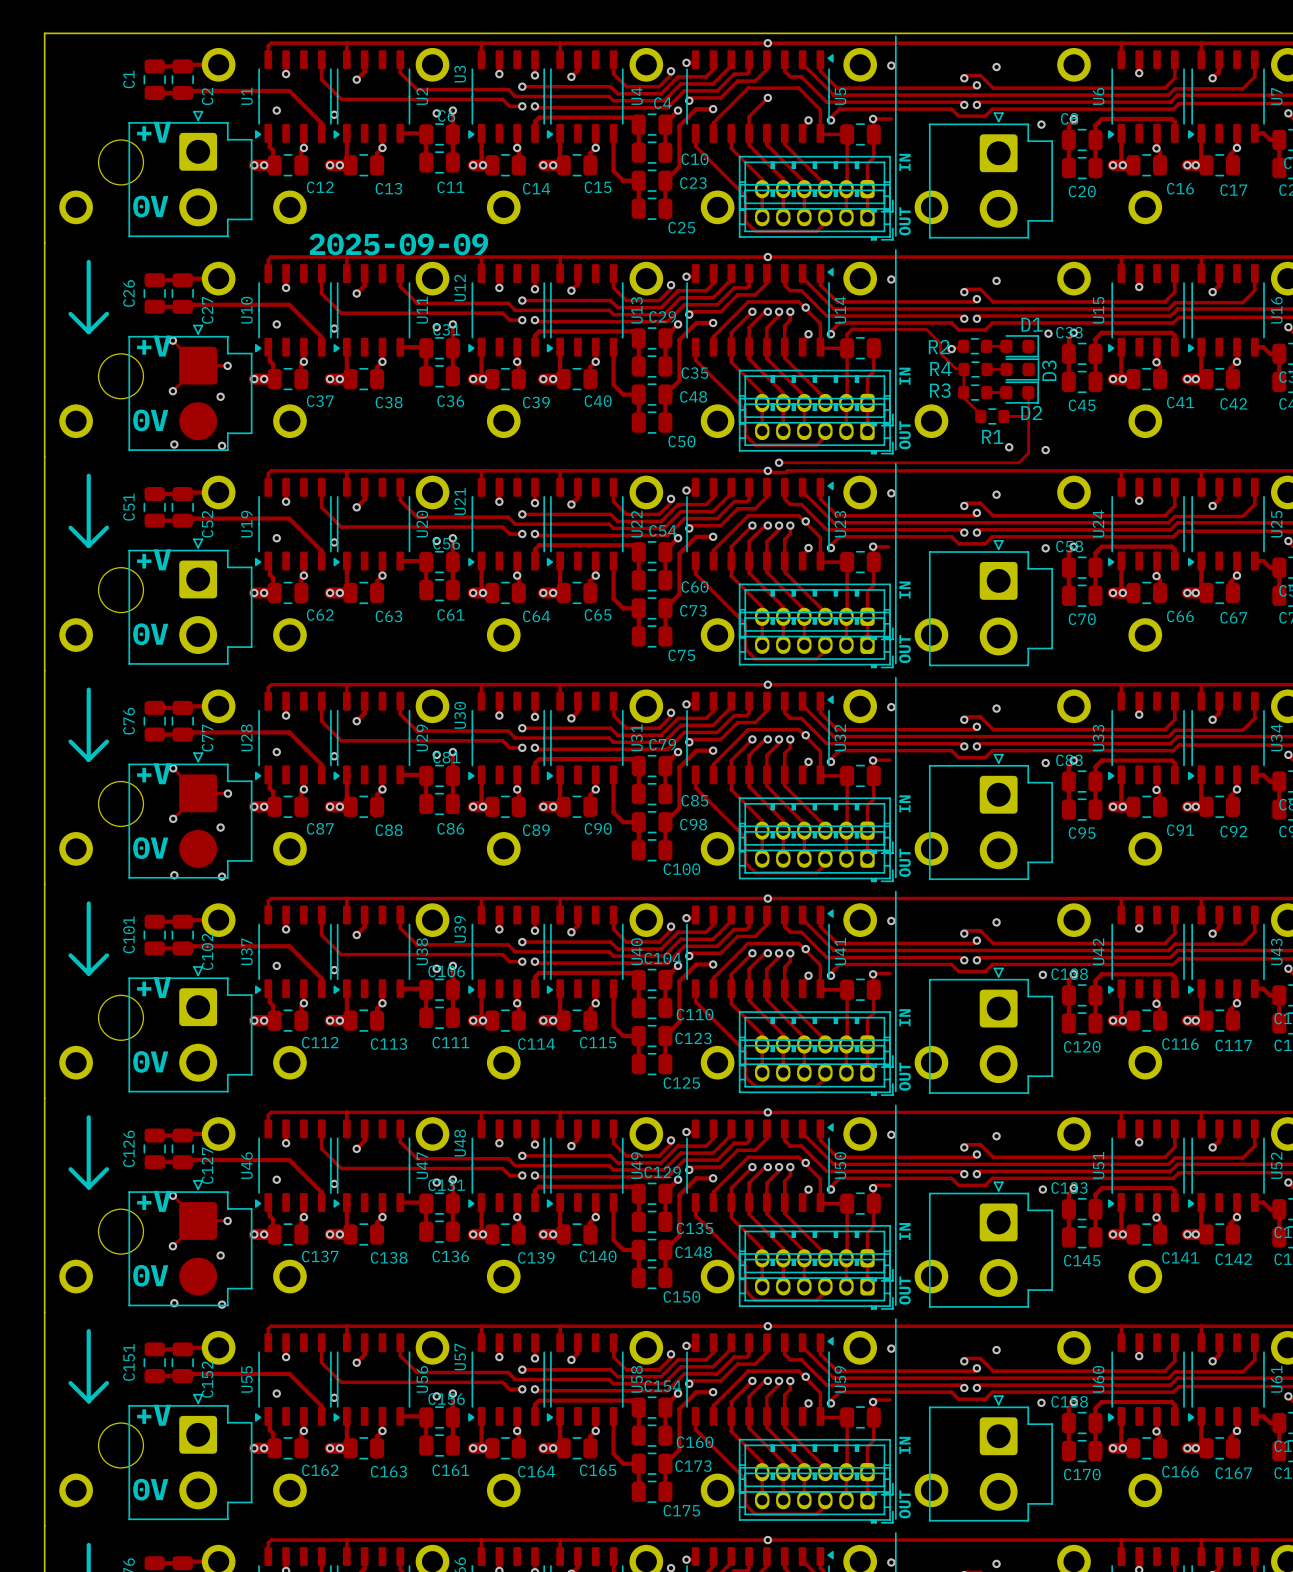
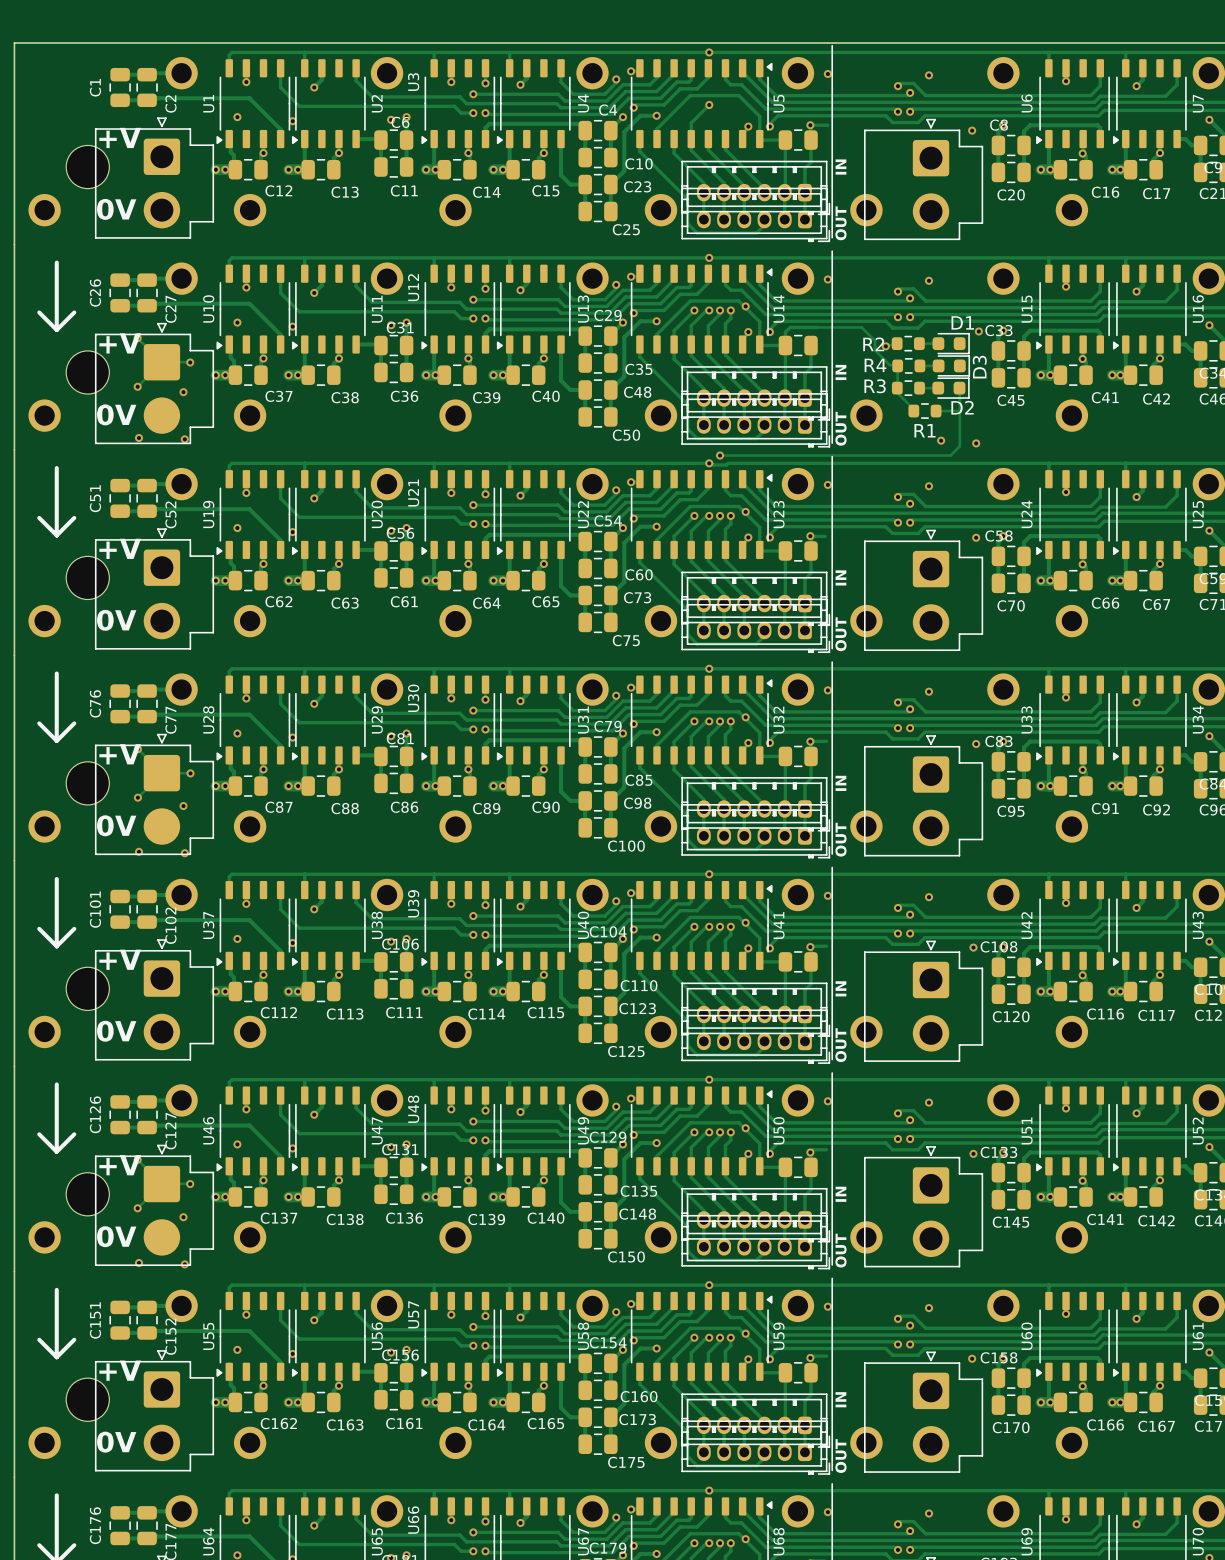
text: 2025-09-09 (398, 244) -> none

